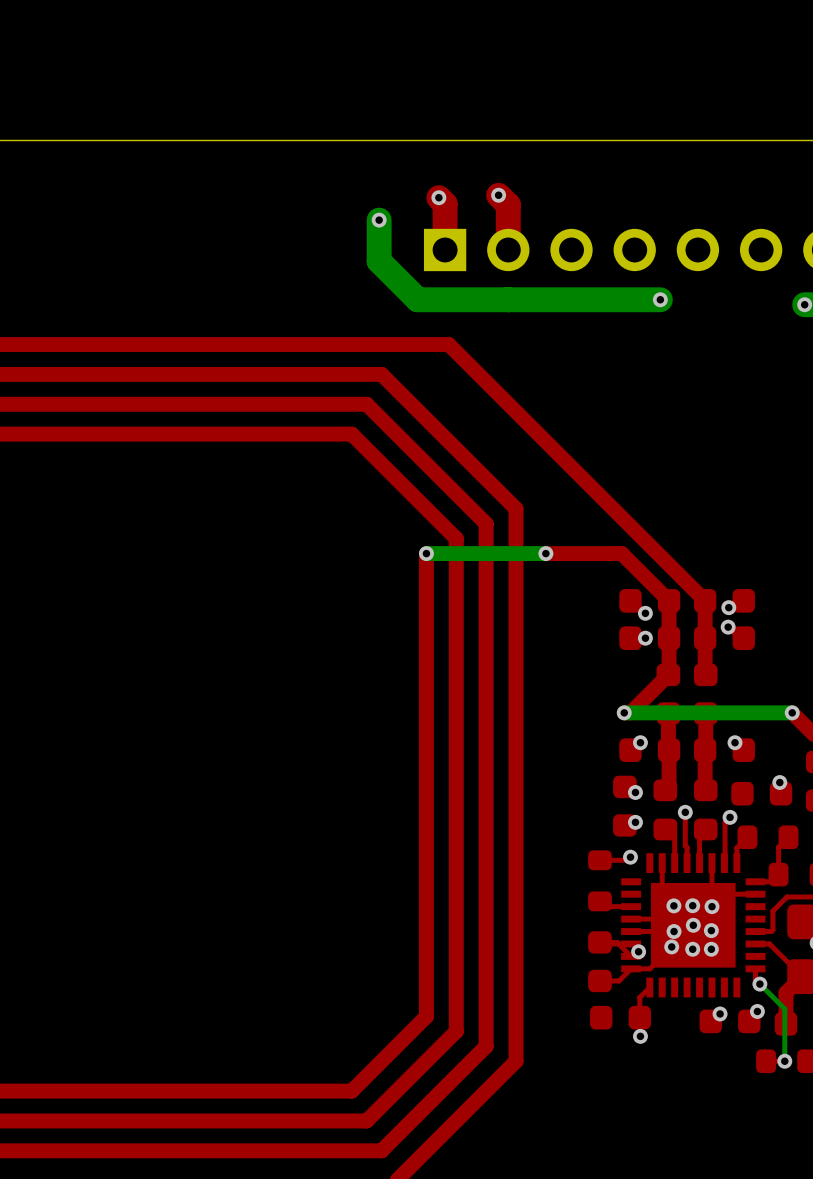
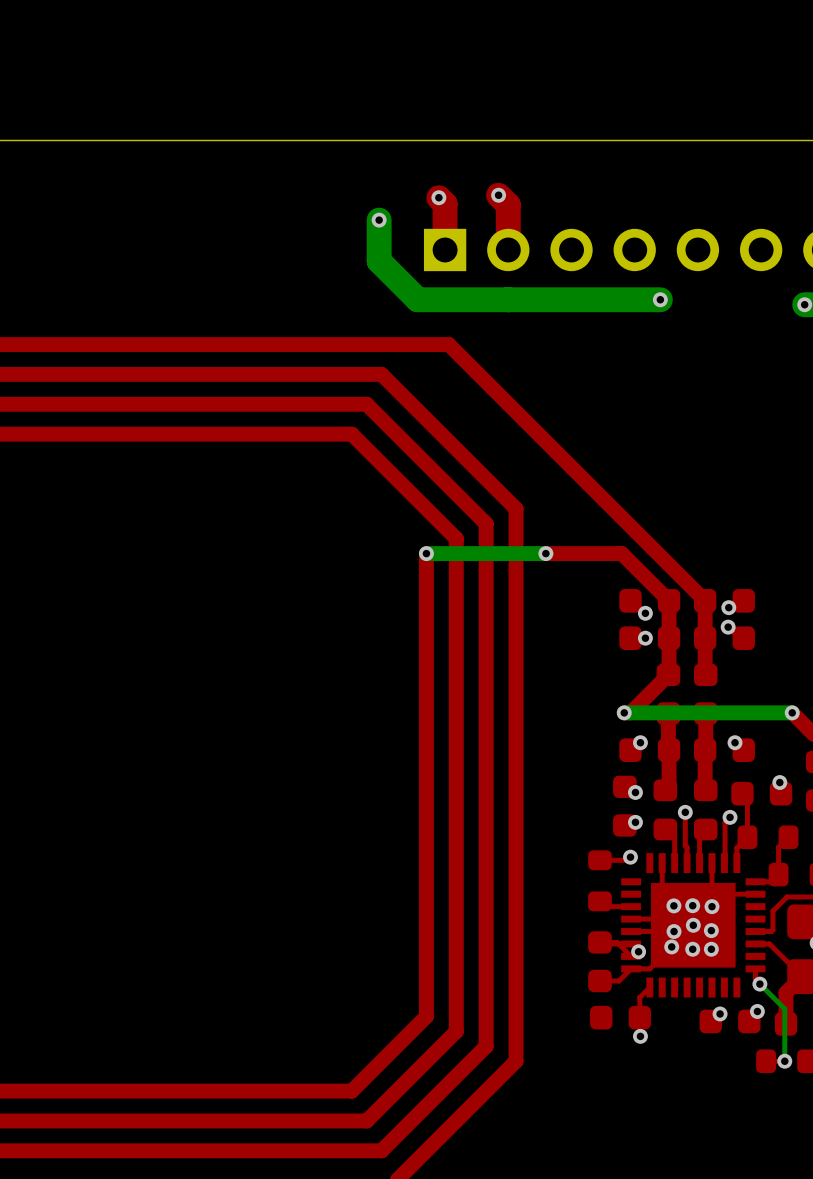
top track: none -> (742, 793) (747, 798) (747, 837)

